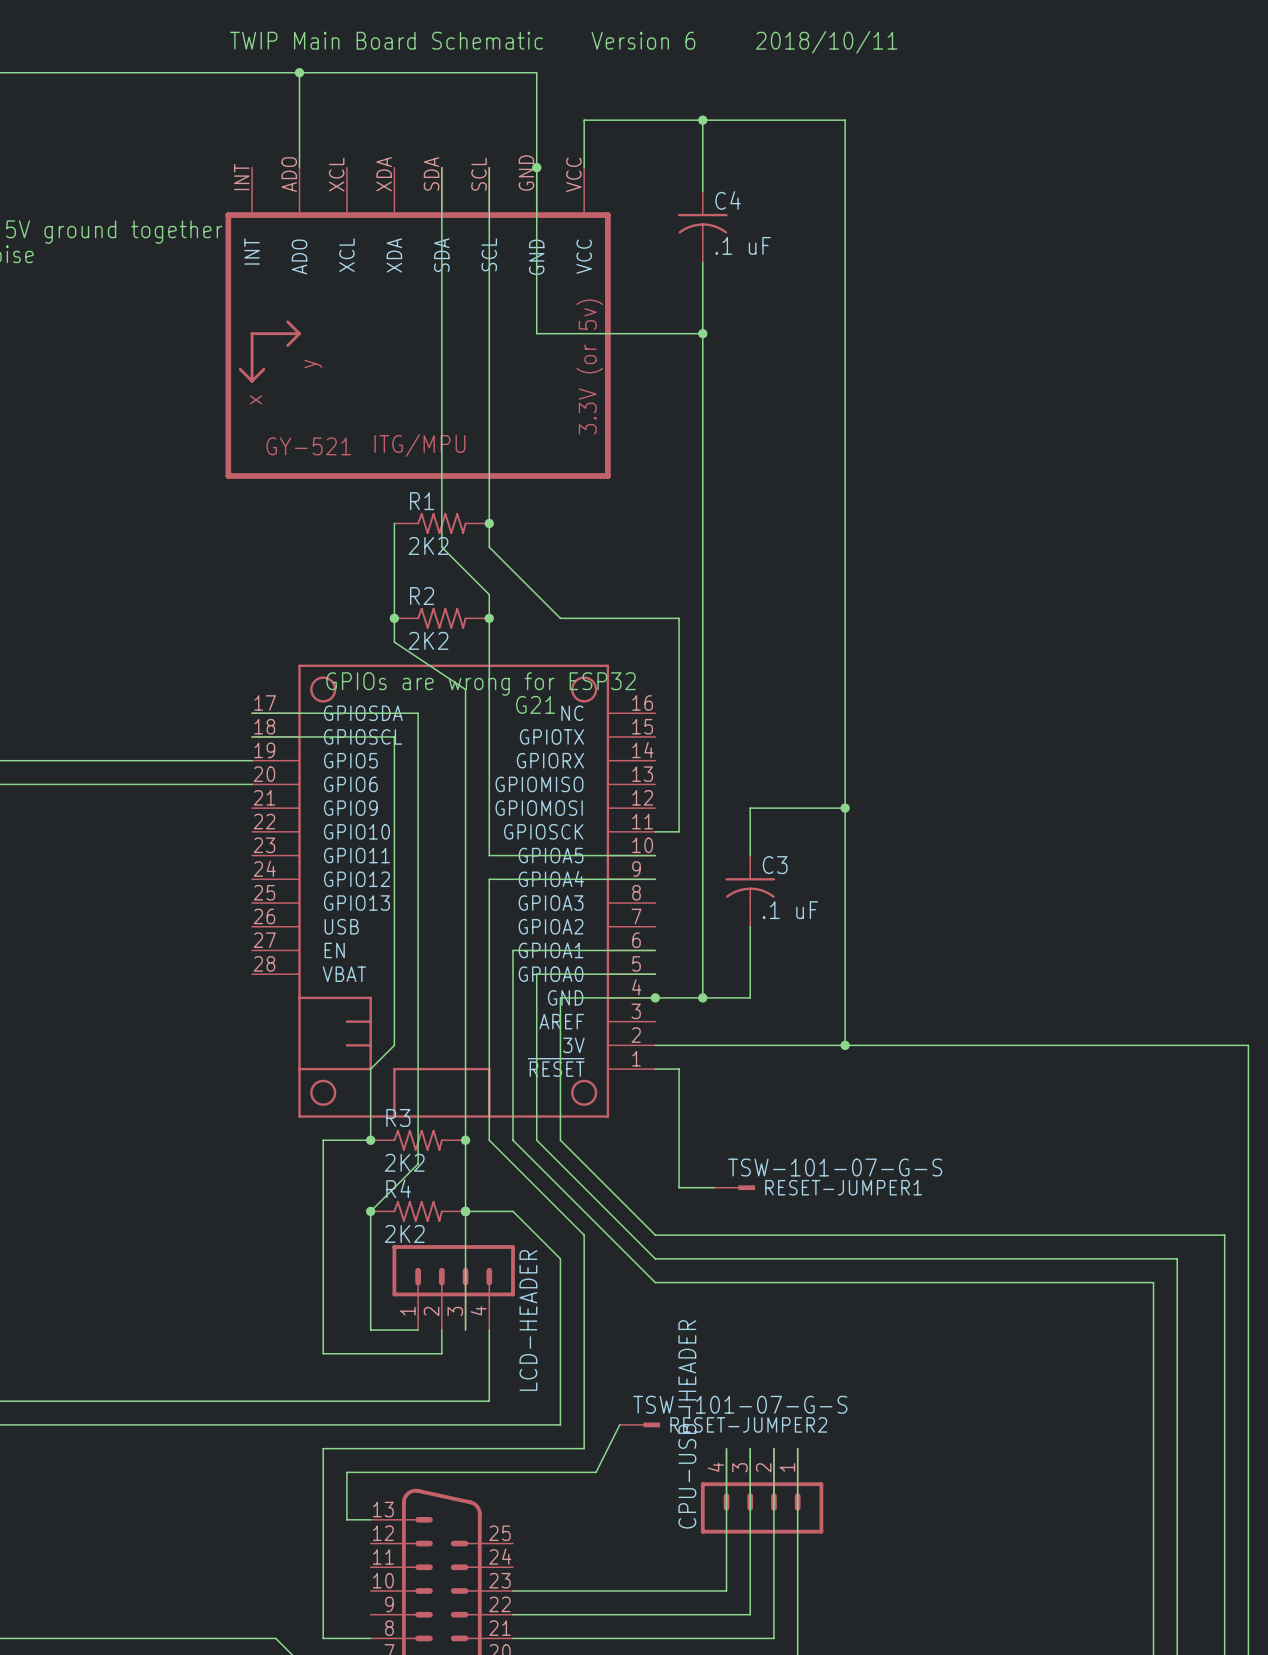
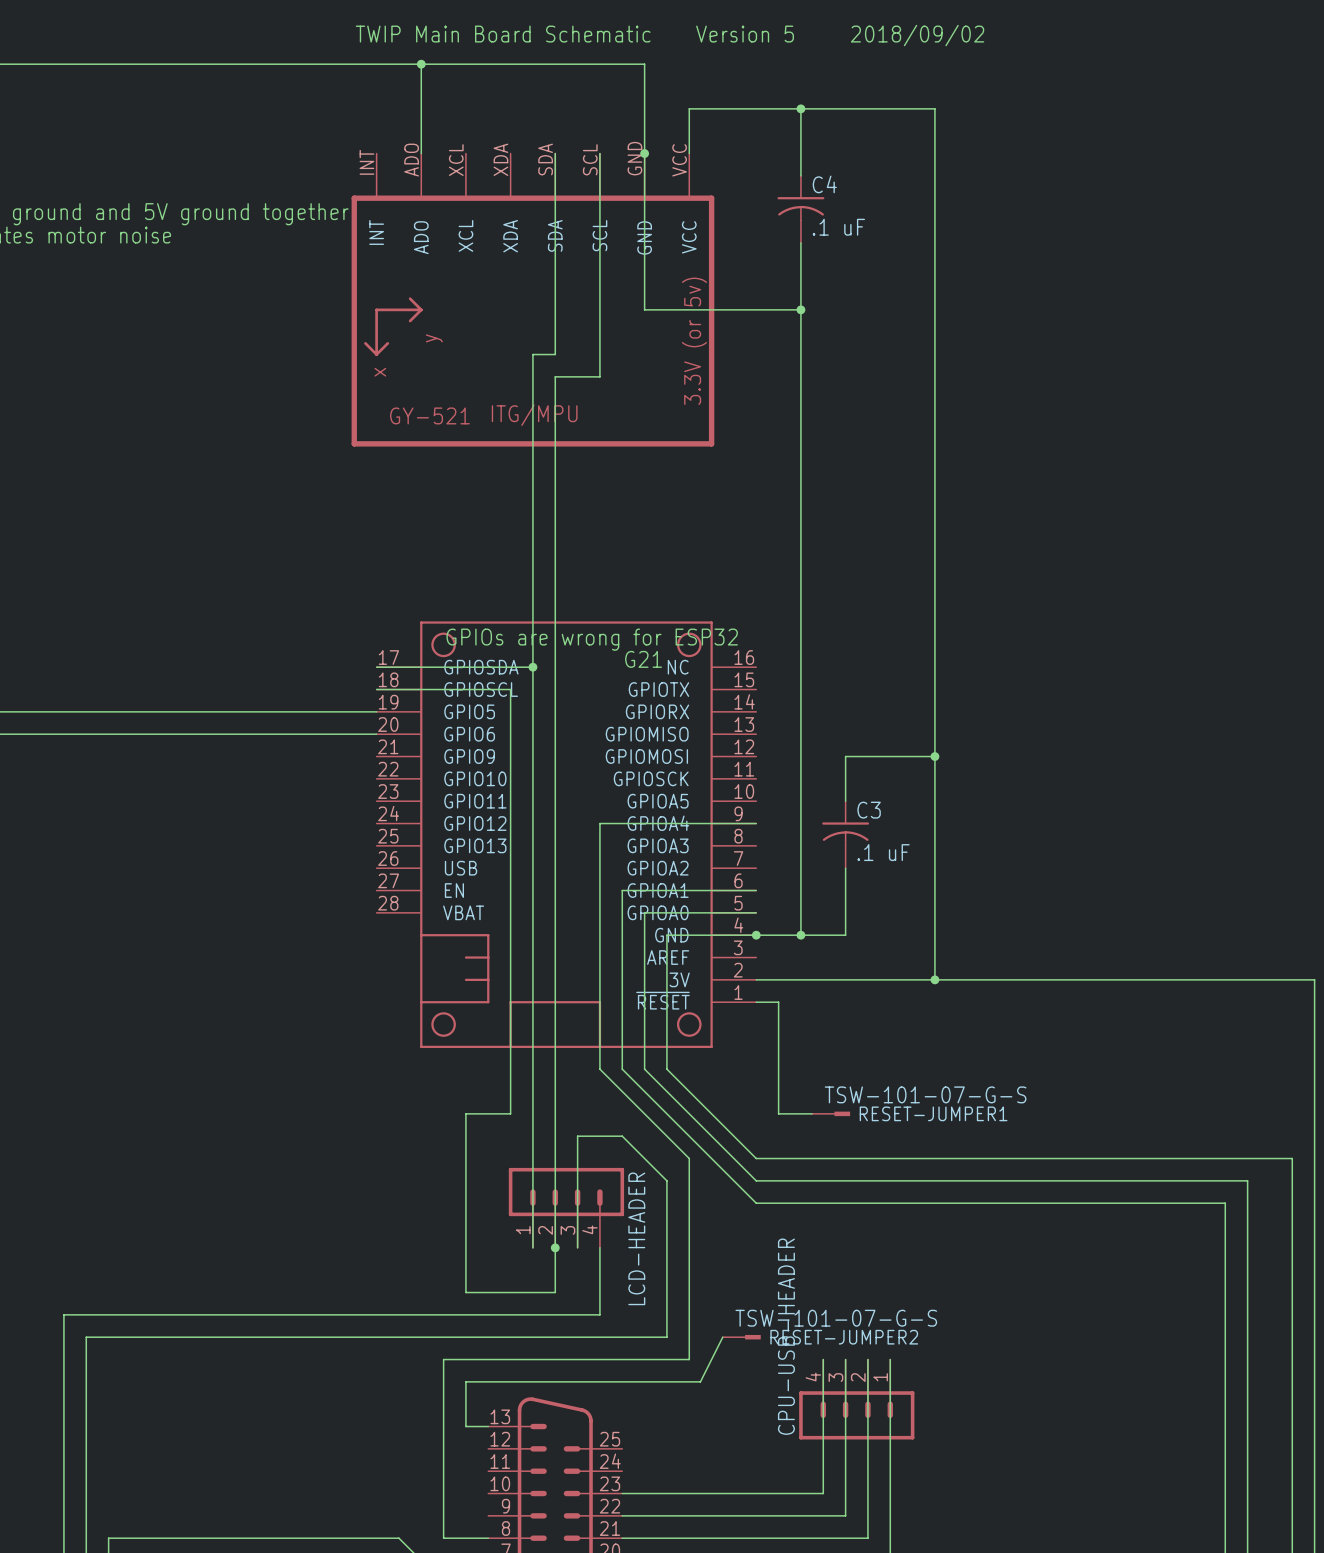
text: TWIP Main Board Schematic Version 6 2018/10/11 (563, 42) -> TWIP Main Board Schematic Version 5 2018/09/02 (670, 35)
wire: (441, 381) (441, 404) -> (599, 376) (555, 376)
wire: none -> (555, 354) (532, 354) (532, 667)
wire: (489, 404) (489, 547) (560, 618) (679, 618) (679, 831) (655, 831) -> none
wire: (394, 523) (394, 642) (465, 689) (465, 1211) -> none
R1: 2K2 (441, 523) -> none
junction: (489, 523) -> none
wire: (441, 547) (489, 594) (489, 855) (655, 855) -> (555, 510) (555, 1247)
junction: (394, 618) -> none
R2: 2K2 (441, 618) -> none
junction: (489, 618) -> none
junction: none -> (532, 667)
wire: (394, 1045) (370, 1069) (370, 1140) (323, 1140) (323, 1353) (441, 1353) -> (510, 979) (510, 1113) (465, 1113) (465, 1292) (555, 1292) (555, 1270)
junction: (370, 1140) -> none
R3: 2K2 (418, 1140) -> none
junction: (465, 1140) -> none
wire: (418, 1163) (370, 1211) (370, 1330) (418, 1330) -> (532, 1091) (532, 1247)
junction: (370, 1211) -> none
R4: 2K2 (418, 1211) -> none
junction: (465, 1211) -> none
junction: none -> (555, 1247)

